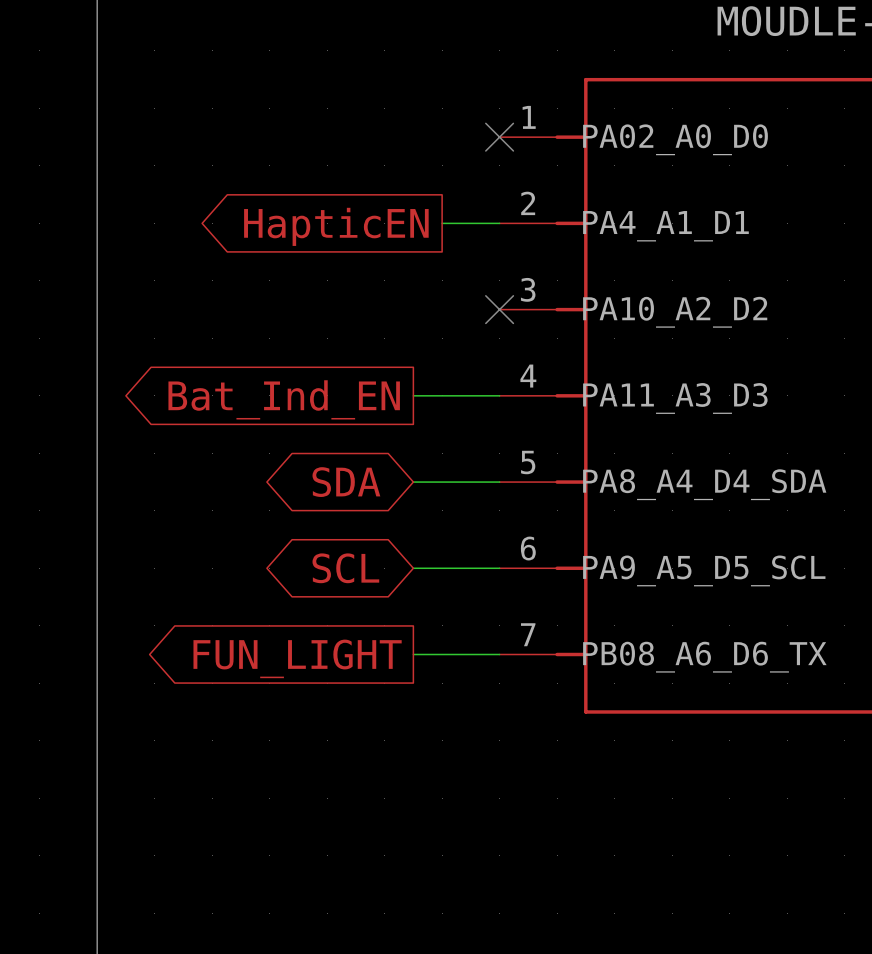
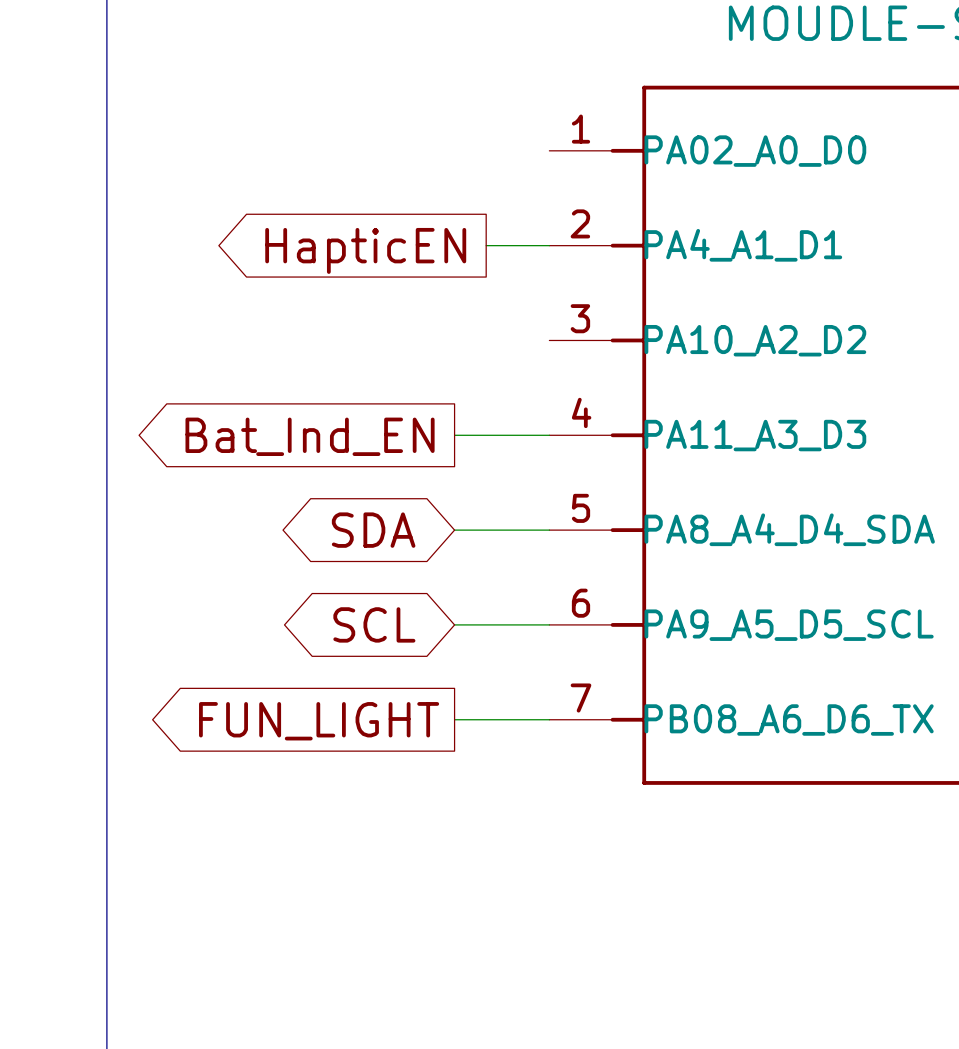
no-connect mark: (499, 137) -> none
no-connect mark: (499, 309) -> none

